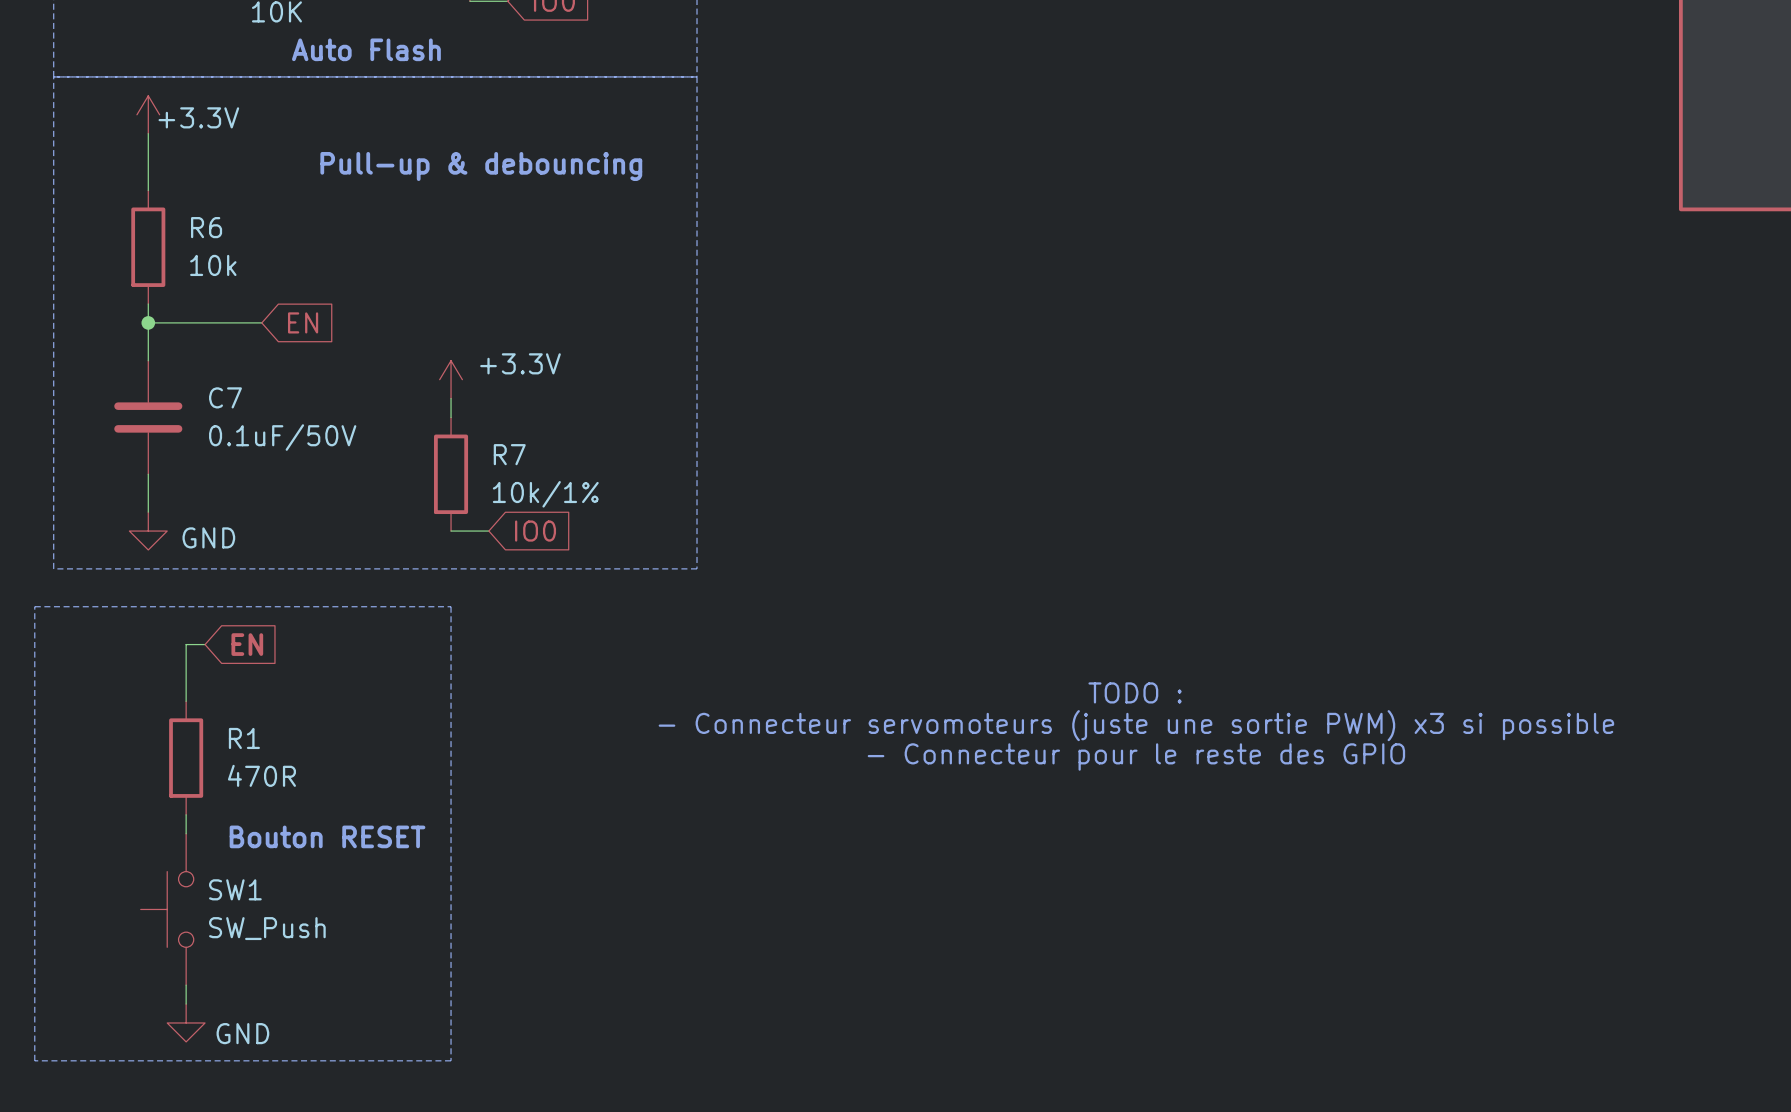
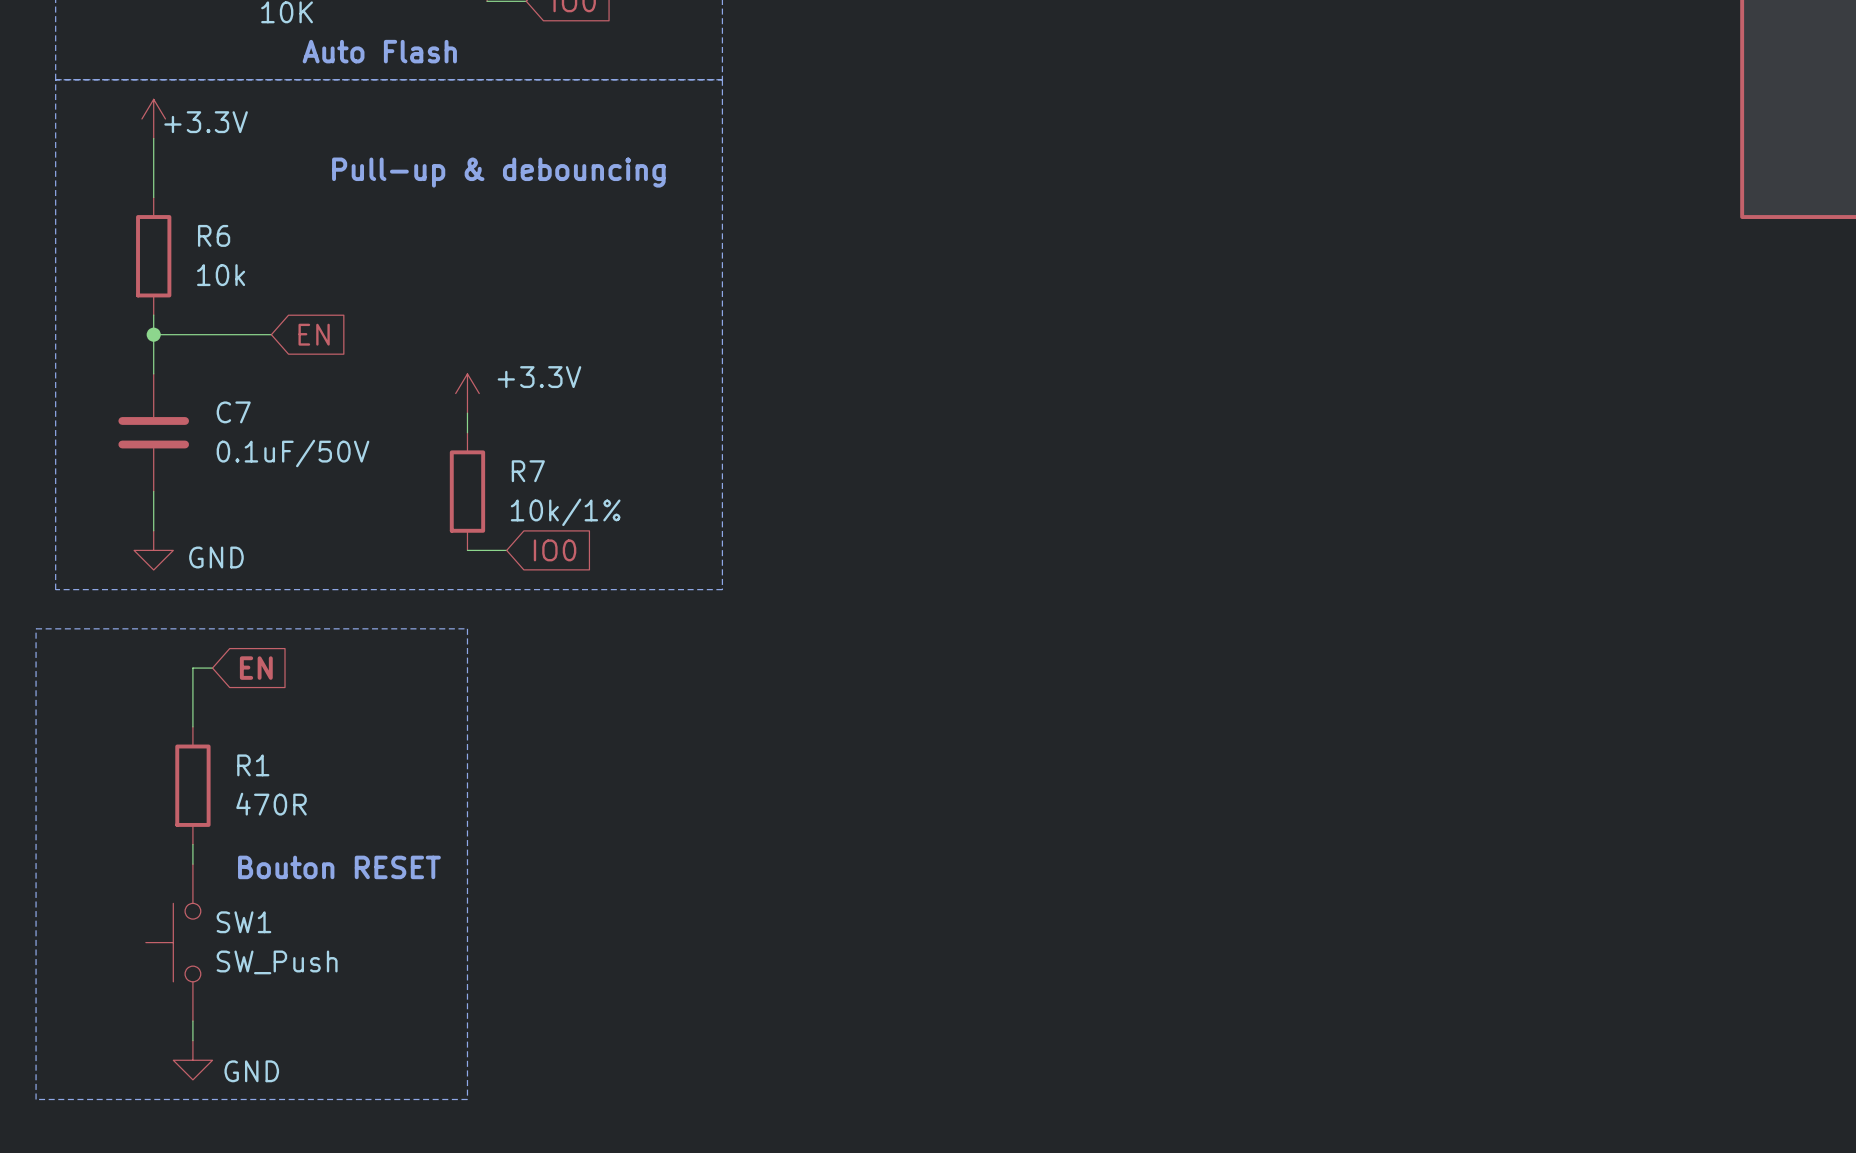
text: TODO : (1135, 692) -> none
text: - Connecteur servomoteurs (juste une sortie PWM) x3 si possible (1136, 725) -> none
text: - Connecteur pour le reste des GPIO (1136, 757) -> none

